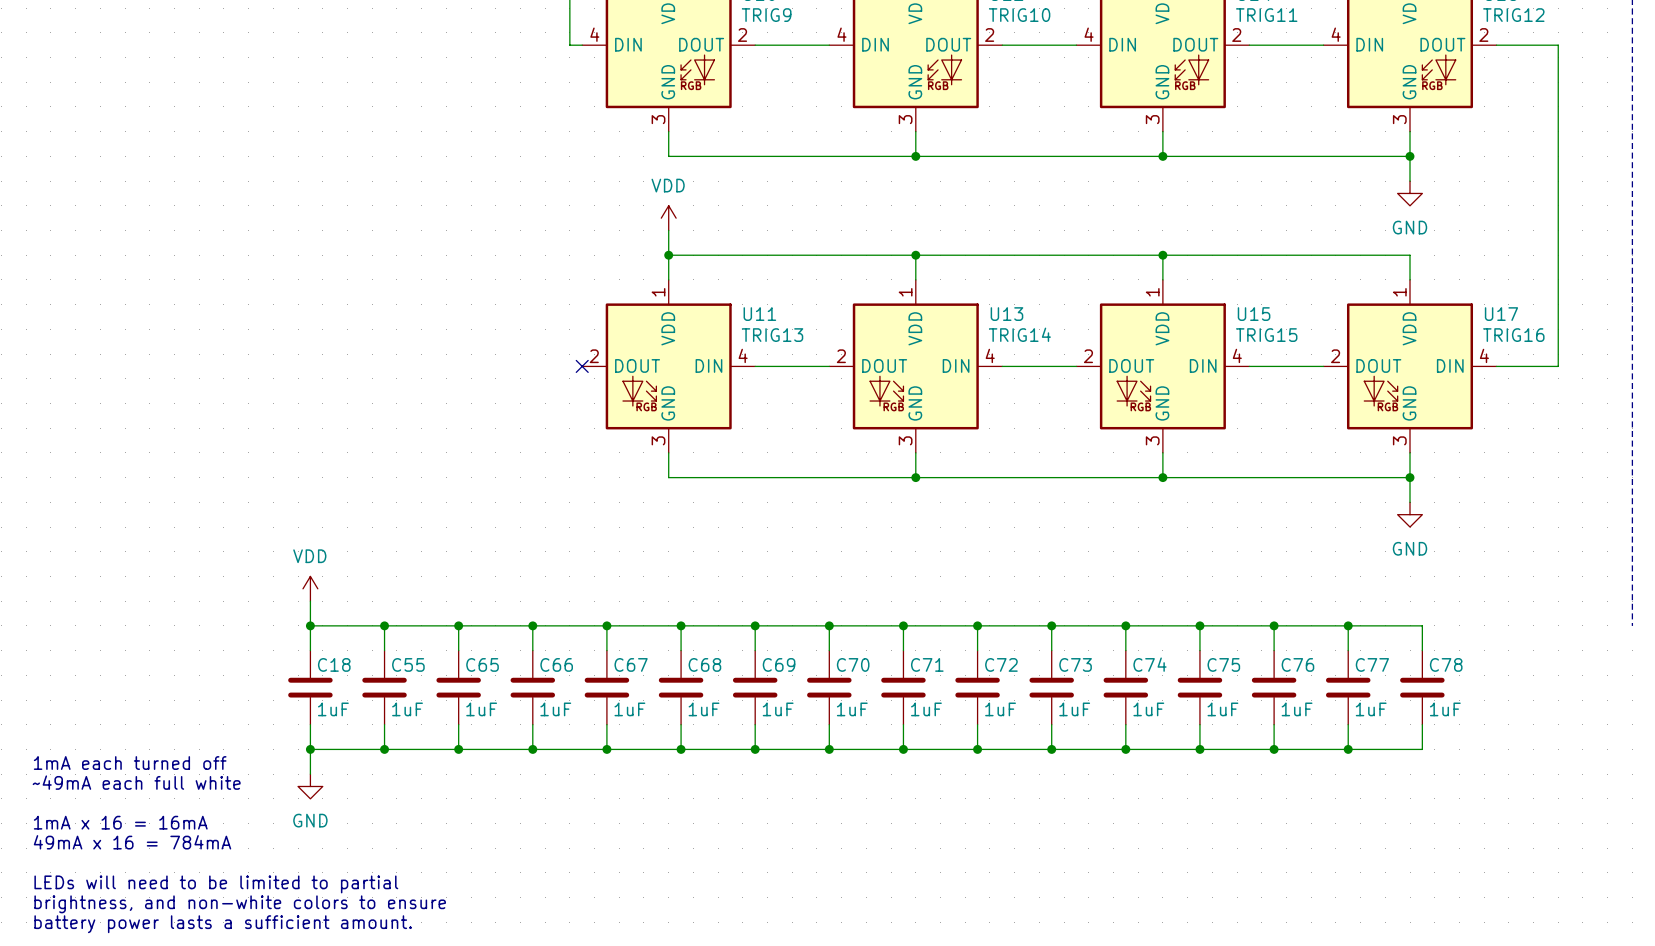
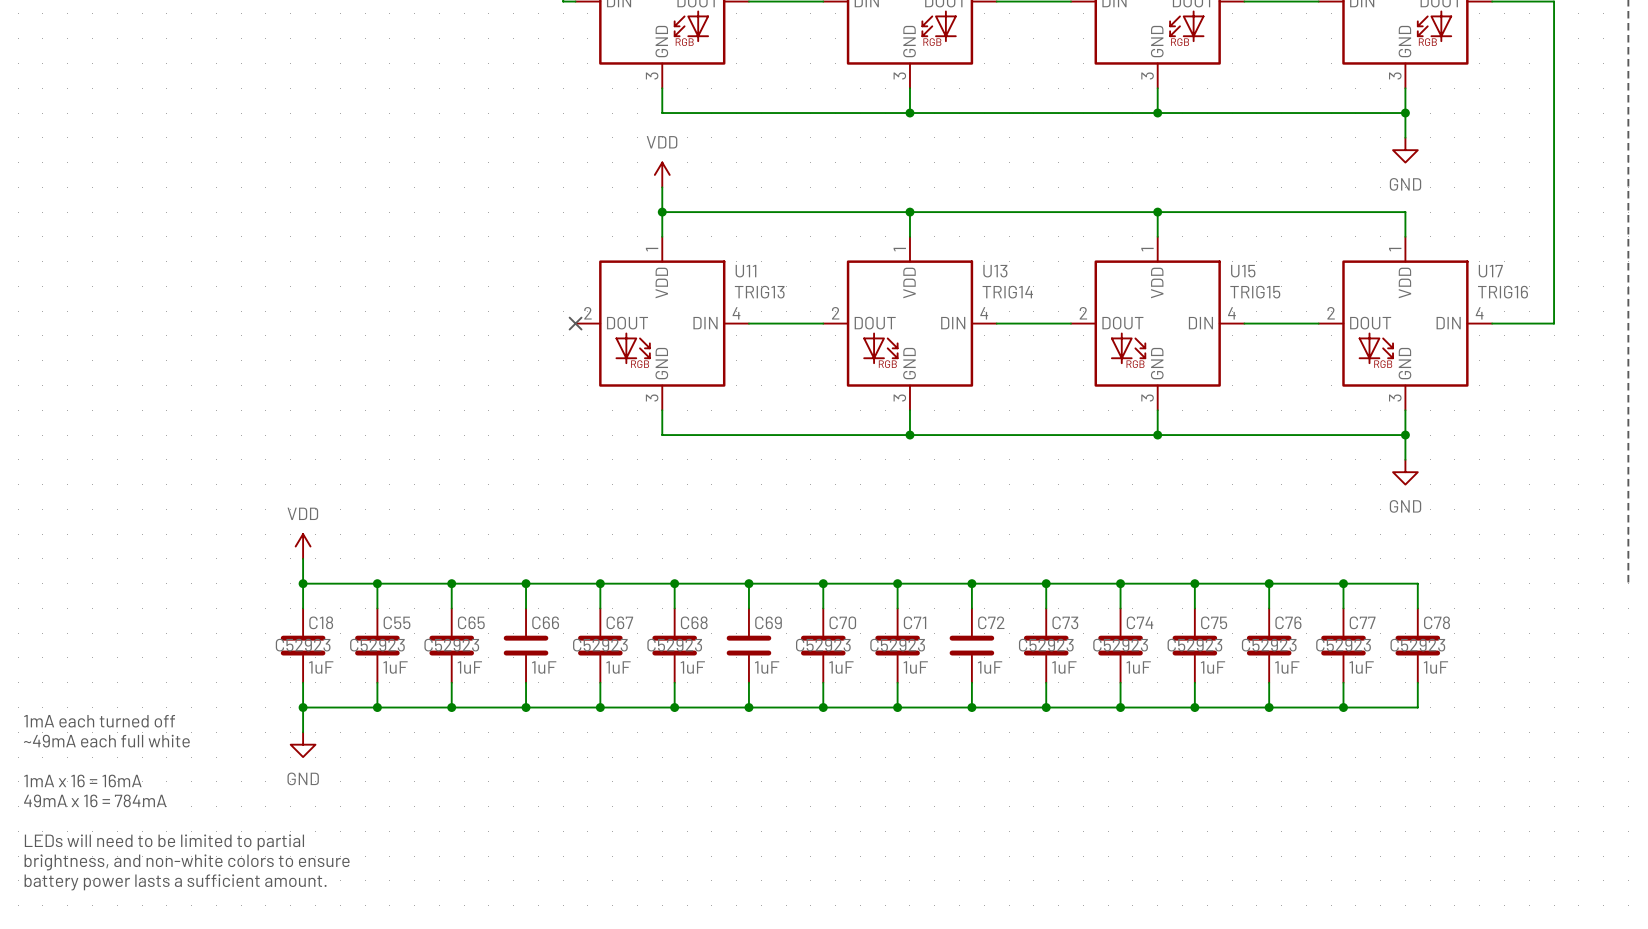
C18 text: none -> C52923 (303, 645)
C55 text: none -> C52923 (377, 645)
C65 text: none -> C52923 (451, 645)
C67 text: none -> C52923 (600, 645)
C68 text: none -> C52923 (674, 645)
C70 text: none -> C52923 (823, 645)
C71 text: none -> C52923 (897, 645)
C73 text: none -> C52923 (1046, 645)
C74 text: none -> C52923 (1120, 645)
C75 text: none -> C52923 (1194, 645)
C76 text: none -> C52923 (1269, 645)
C77 text: none -> C52923 (1343, 645)
C78 text: none -> C52923 (1417, 645)

